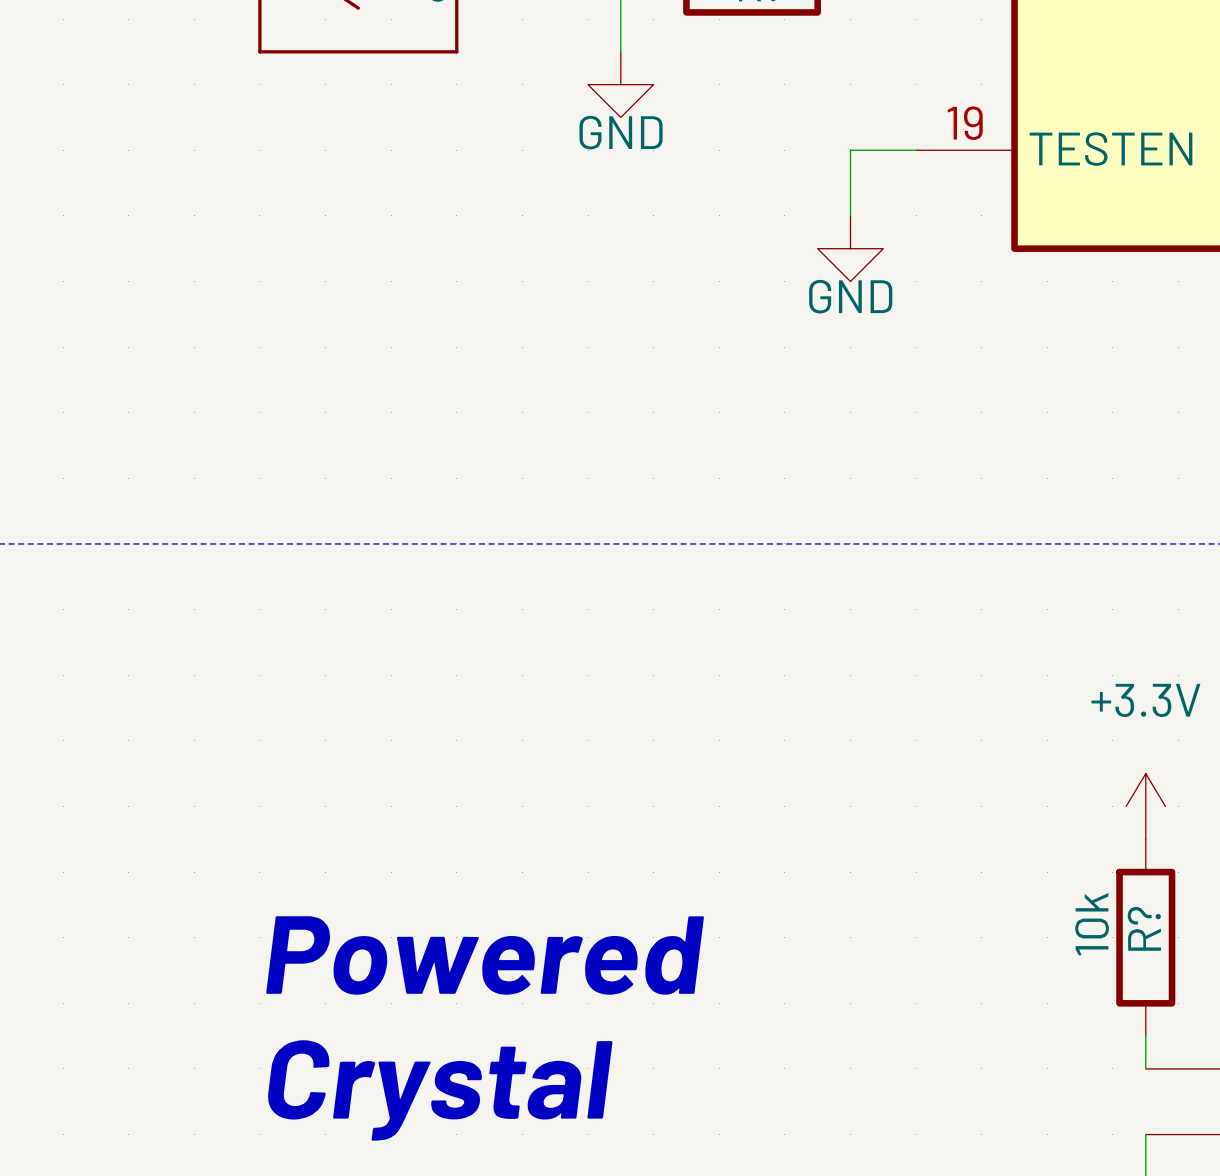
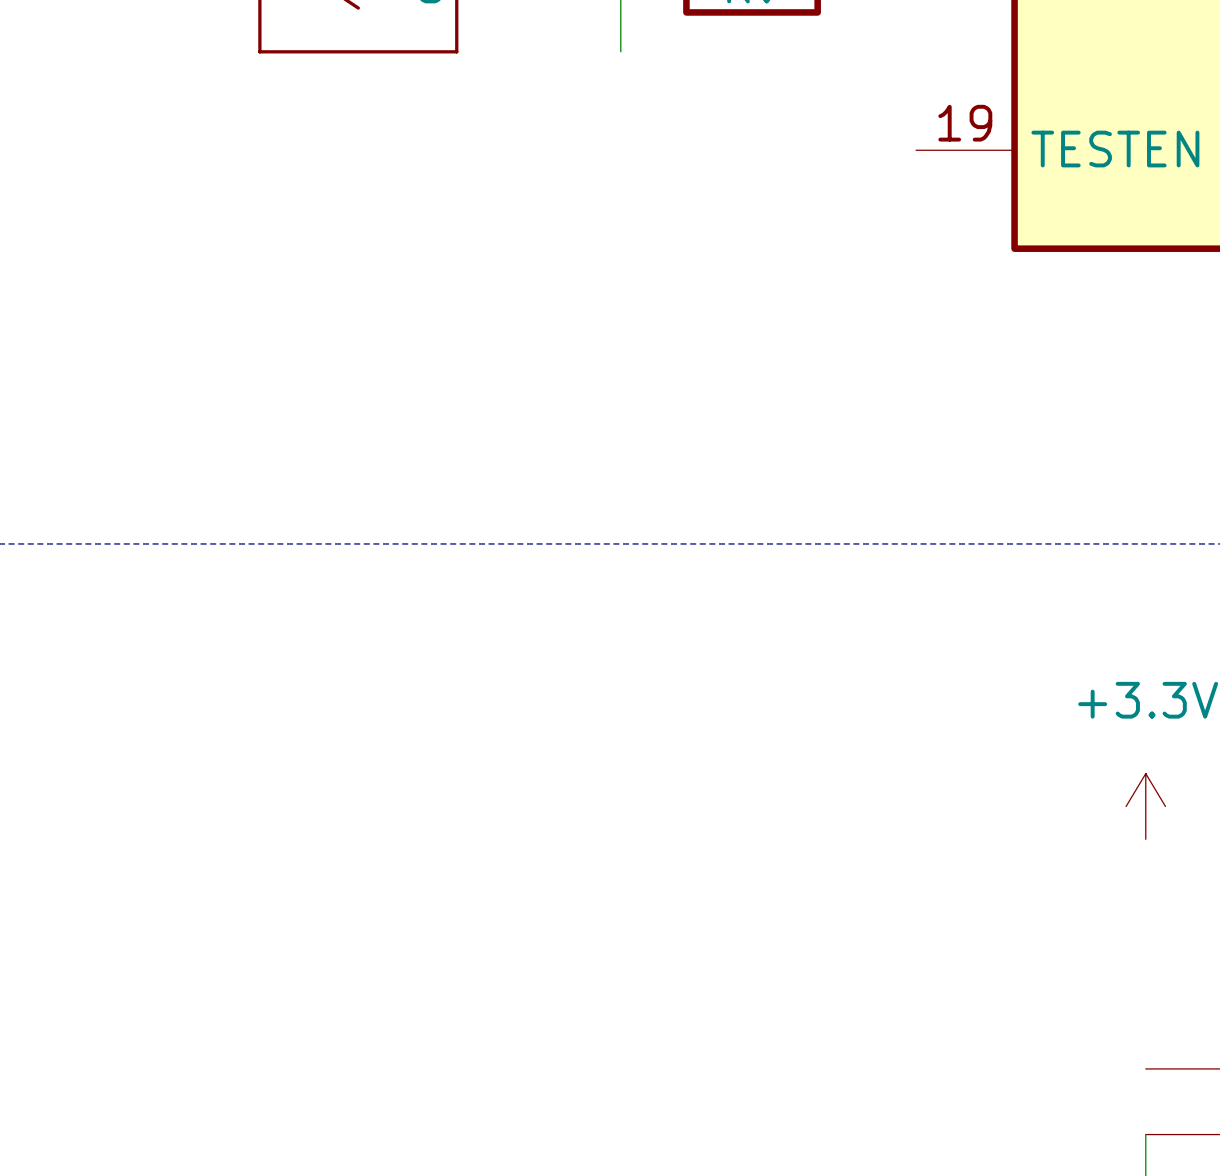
power symbol: GND (620, 84) -> none
wire: (916, 150) (850, 150) (850, 215) -> none
power symbol: GND (850, 248) -> none
R?: 10k (1145, 937) -> none
text: Powered (485, 955) -> none
wire: (1145, 1036) (1145, 1068) -> none
text: Crystal (439, 1090) -> none

